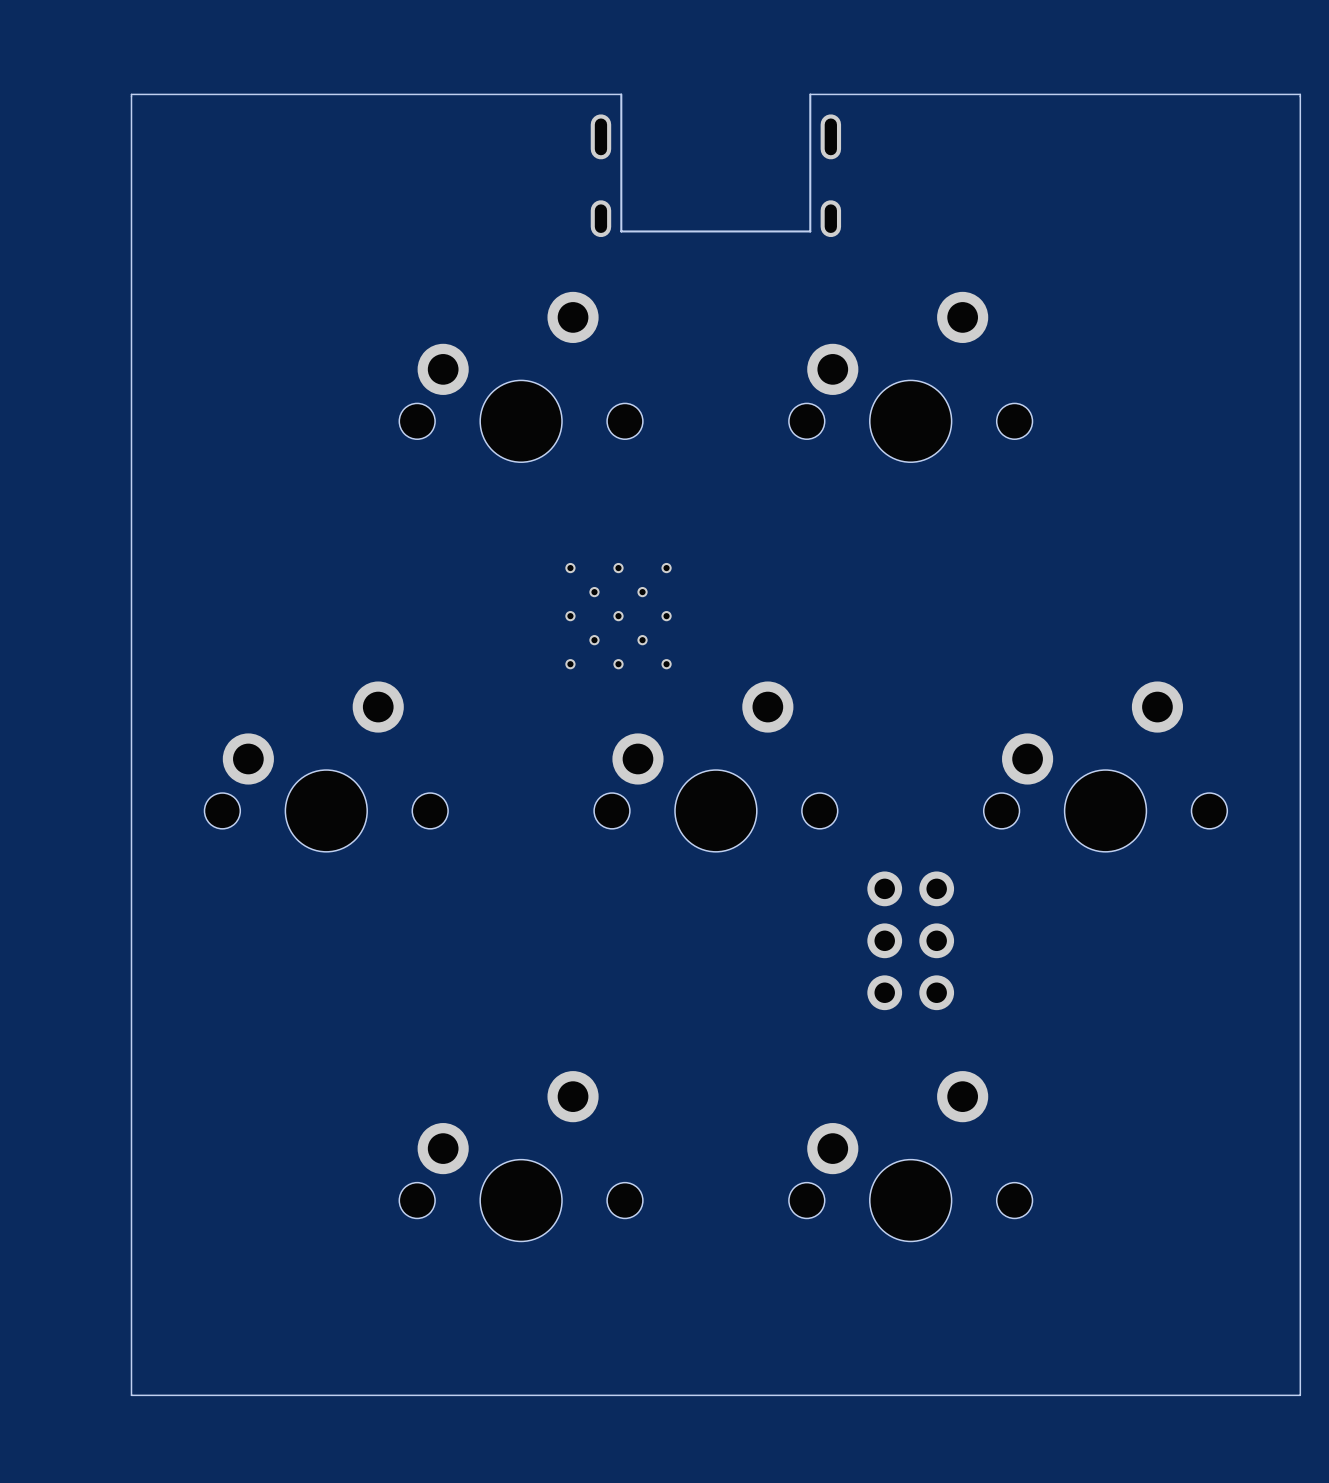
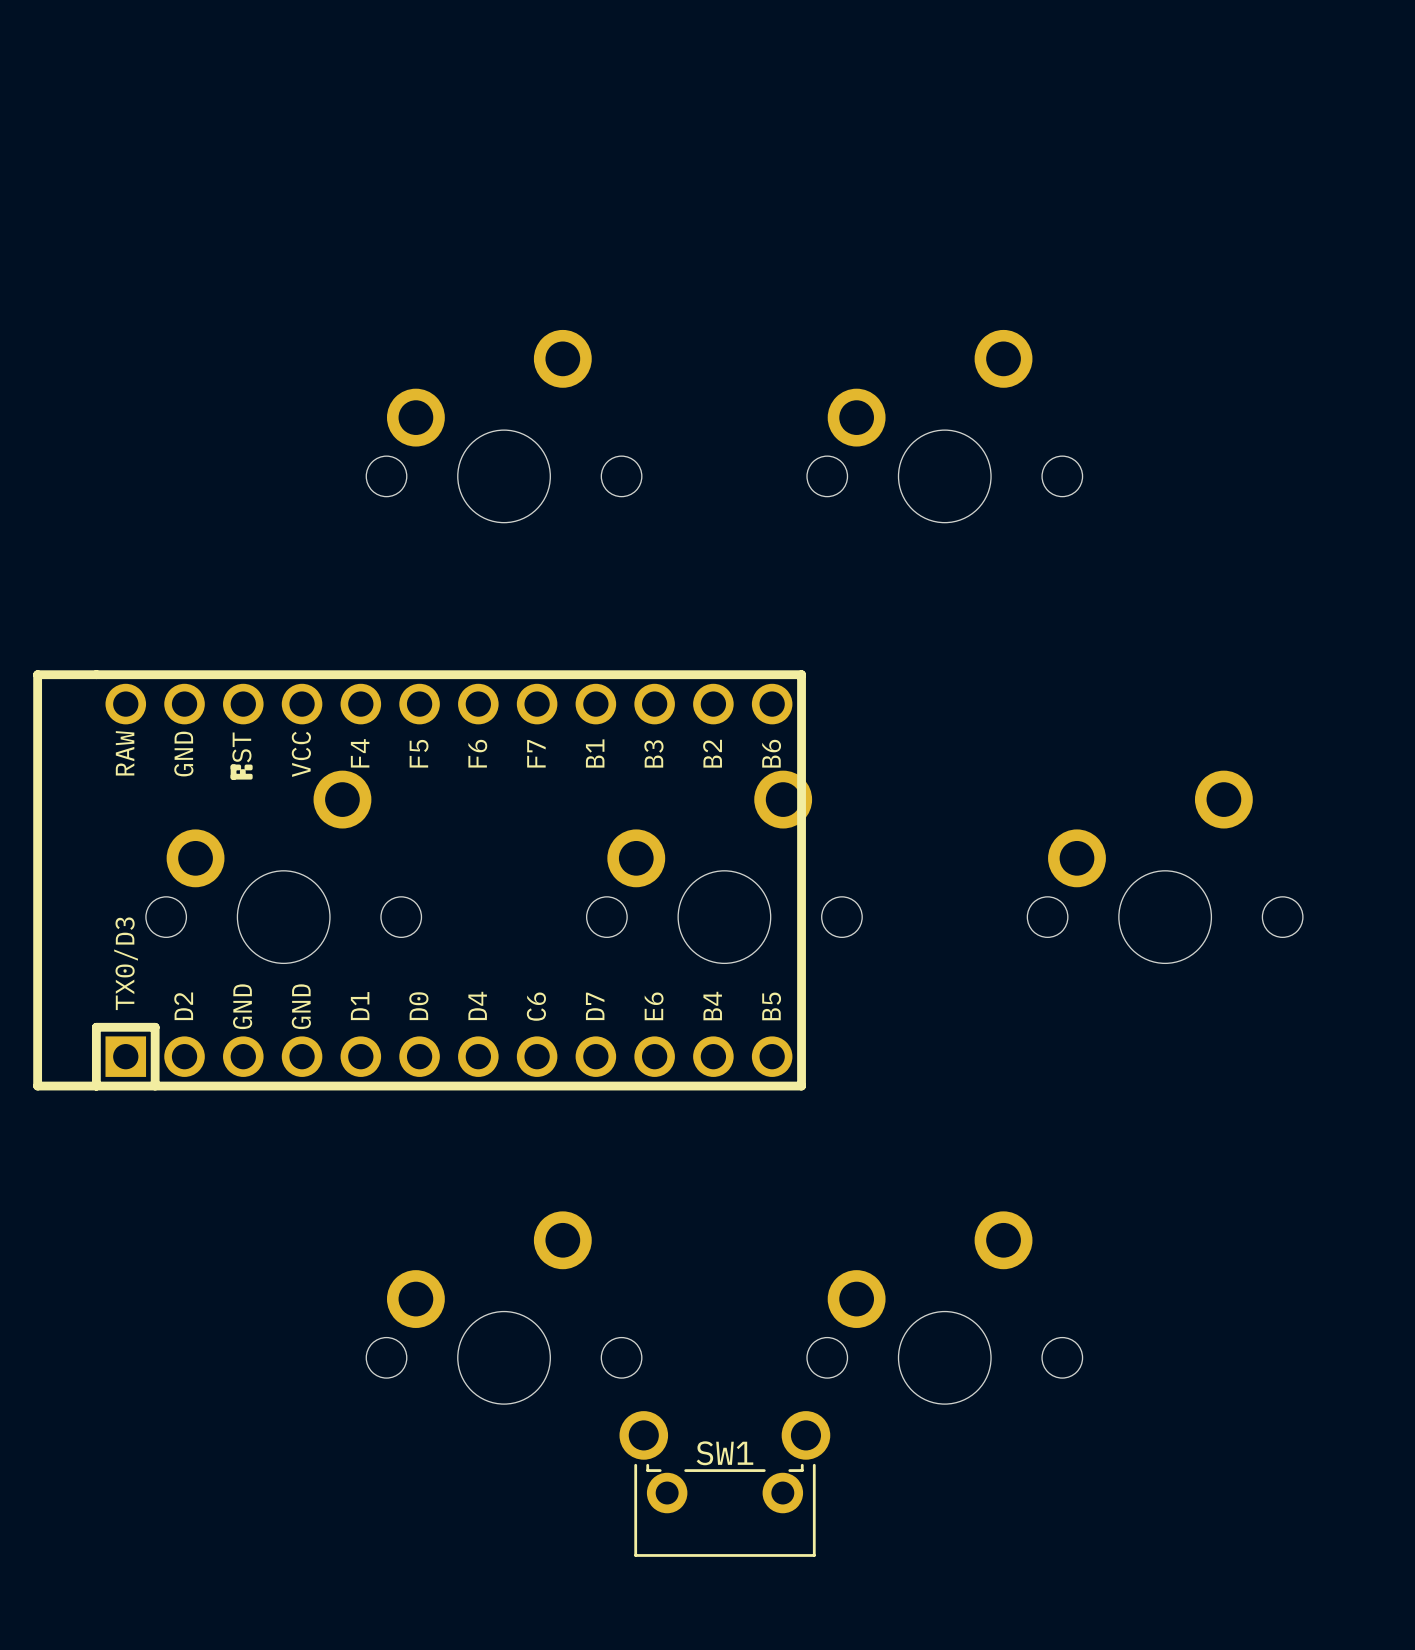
board edge: (621, 94) (131, 94) (131, 1395) (1300, 1395) (1300, 94) (810, 94) -> none
part: (715, 165) -> none
part: (618, 616) -> none
part: none -> (419, 880)
part: (910, 940) -> none
SW1: none -> (724, 1483)

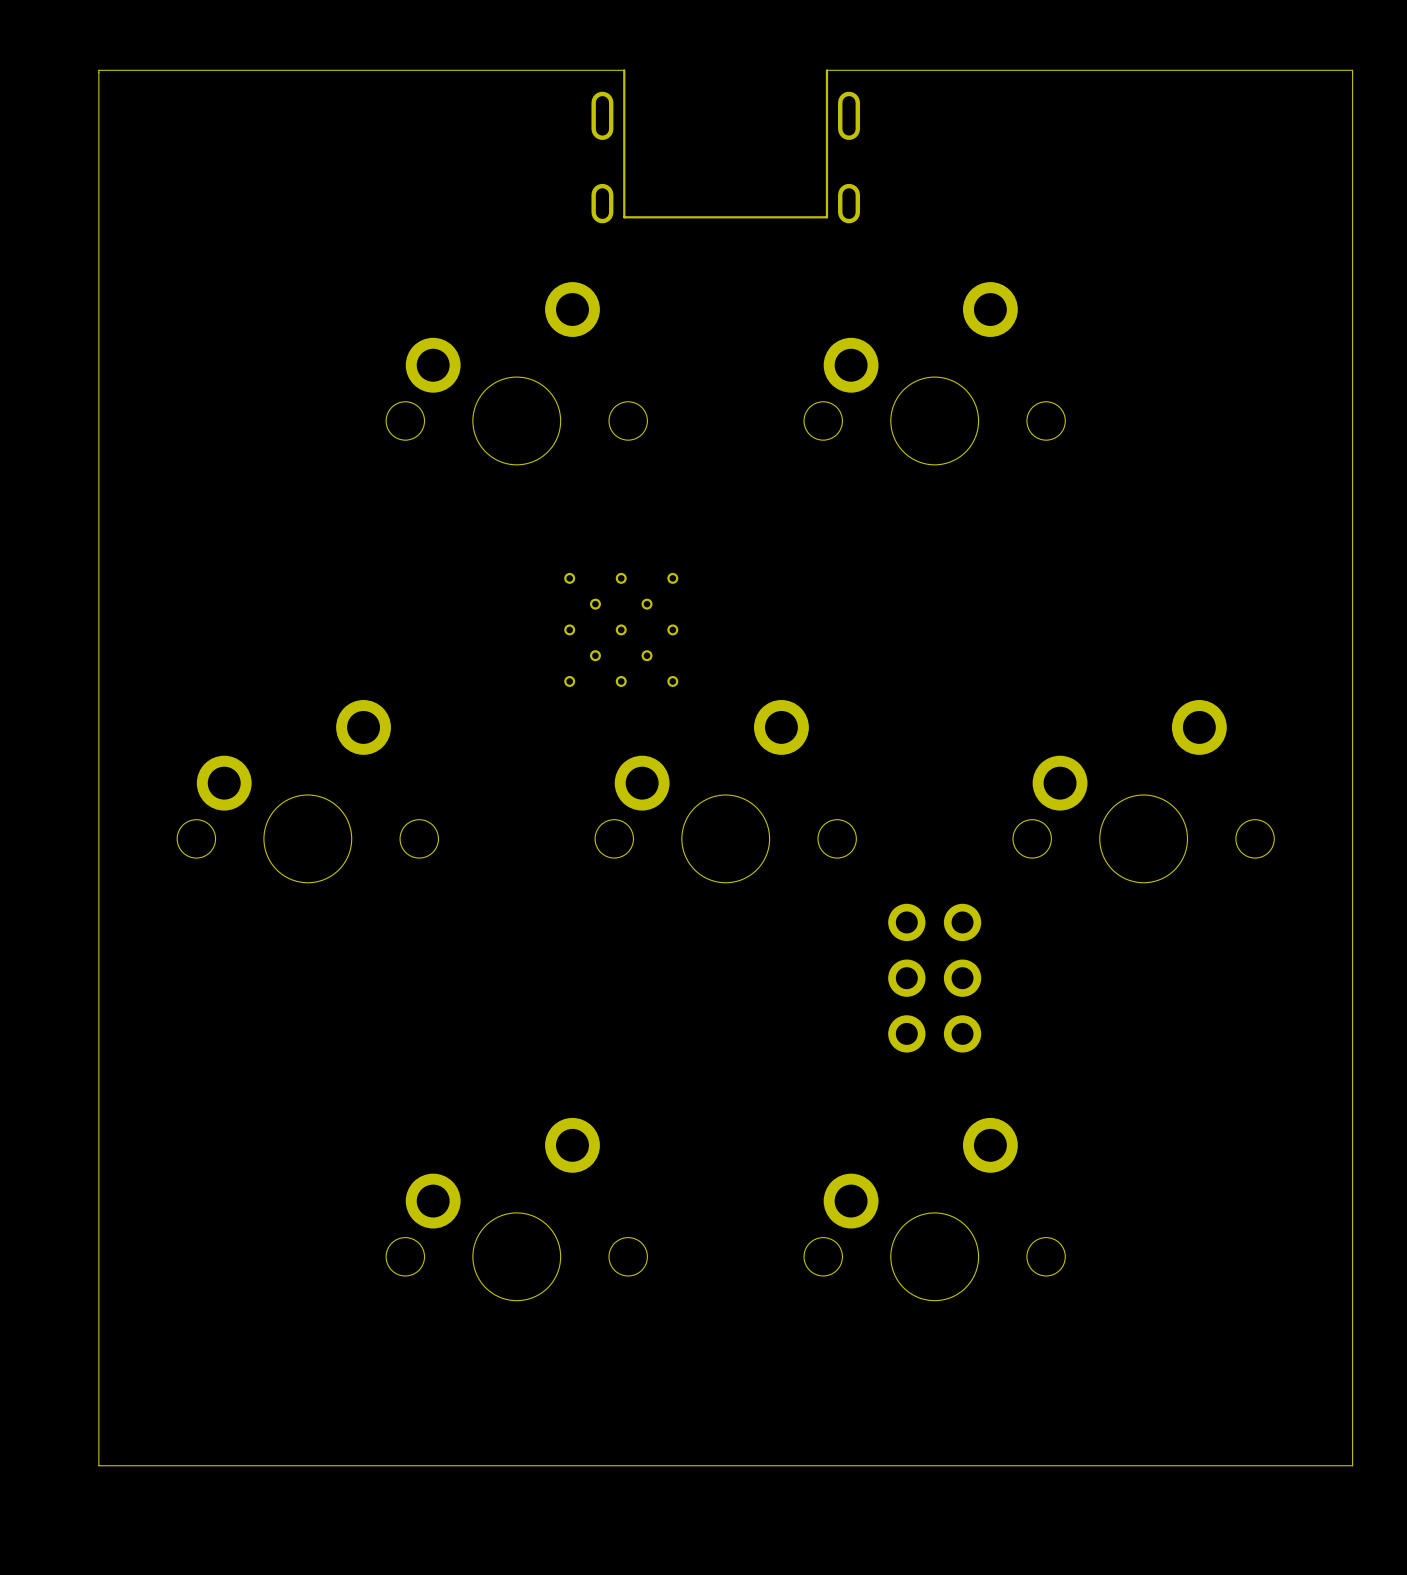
board edge: none -> (624, 70) (98, 70) (98, 1465) (1352, 1465) (1352, 70) (826, 70)
part: none -> (725, 146)
part: none -> (621, 629)
part: (419, 880) -> none
part: none -> (934, 978)
SW1: (724, 1483) -> none

